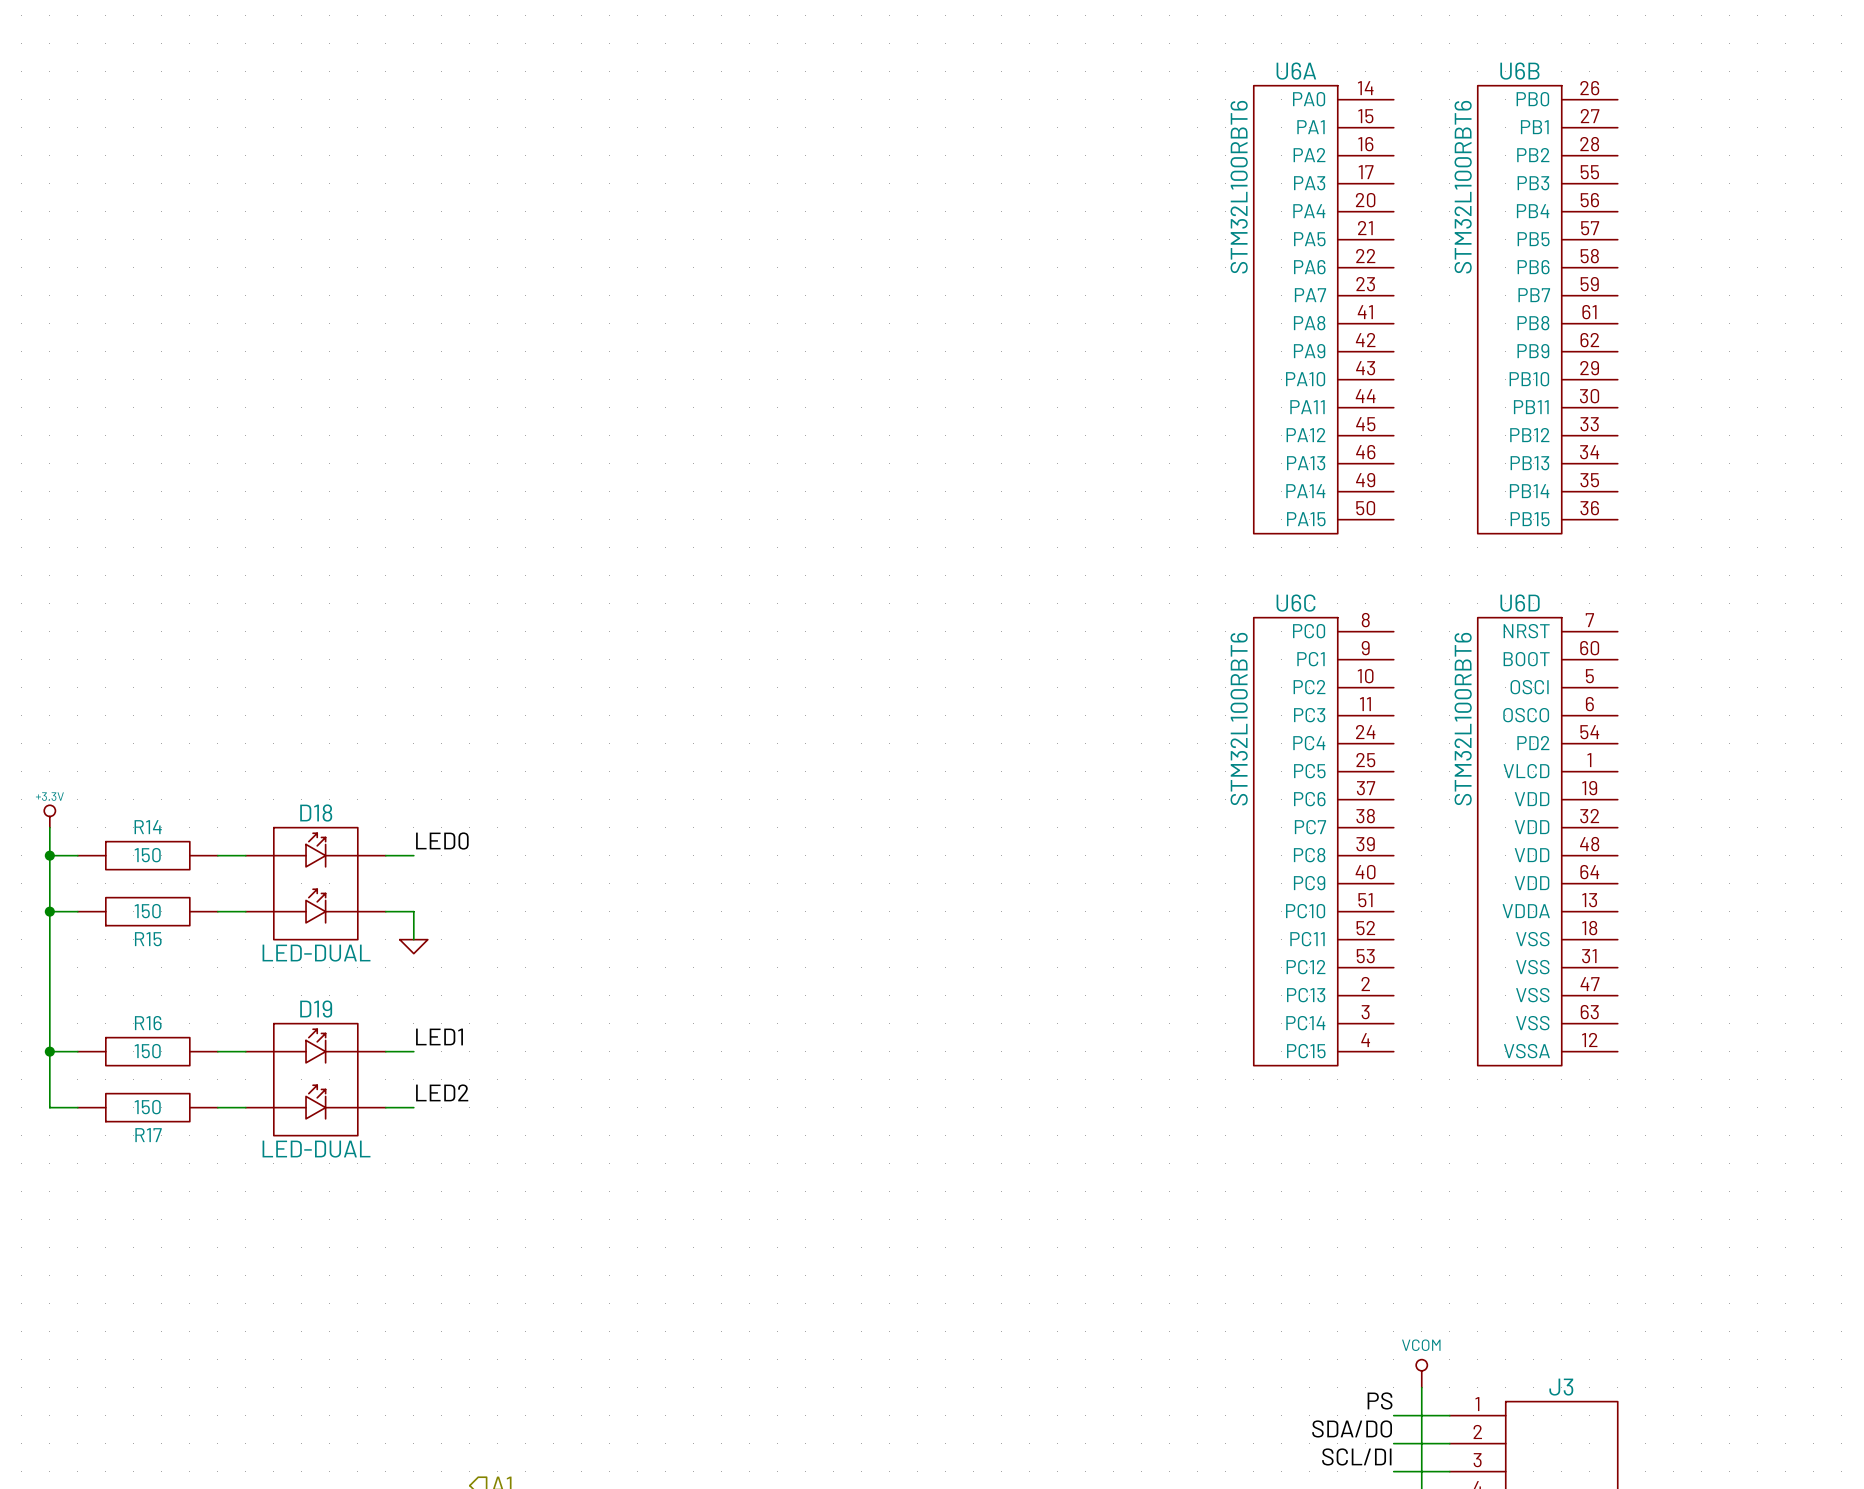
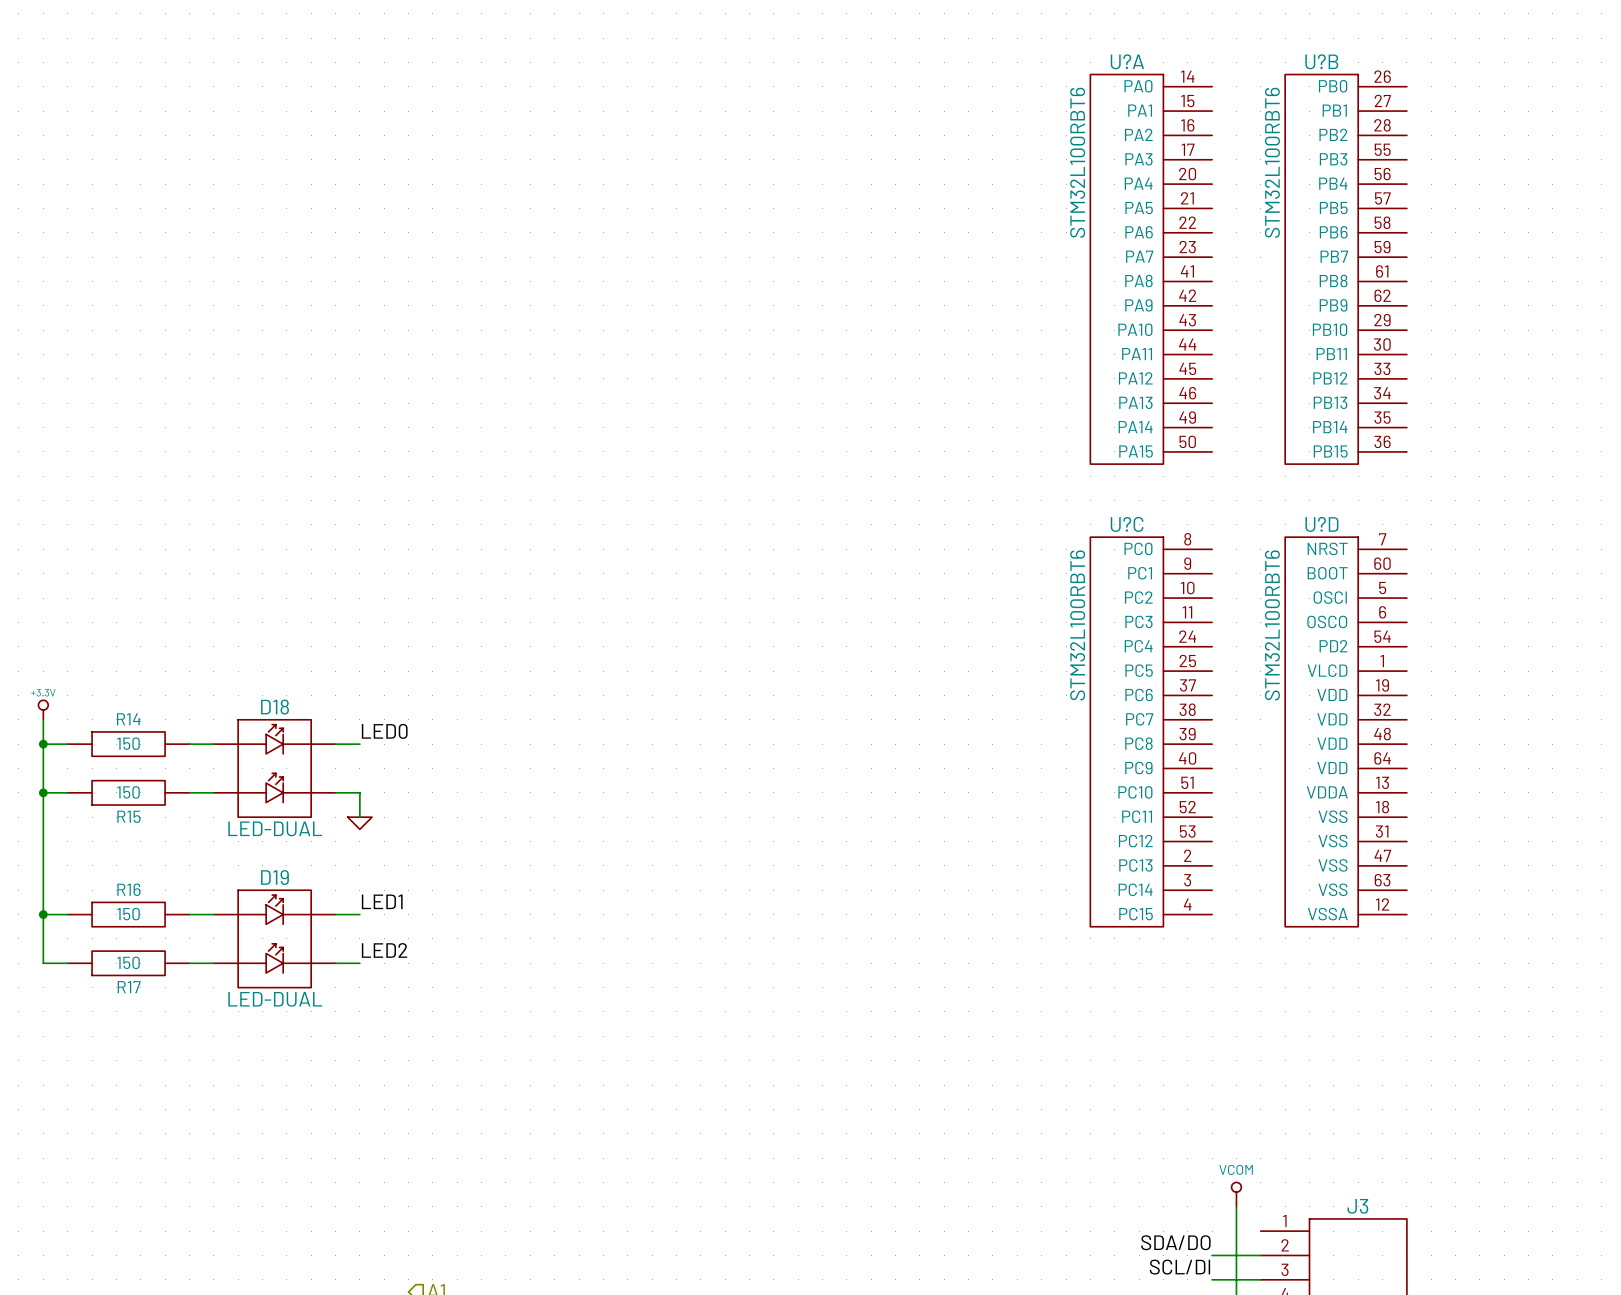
U6A name: U6A (1296, 71) -> U?A (1127, 61)
U6B name: U6B (1519, 71) -> U?B (1321, 61)
U6C name: U6C (1296, 603) -> U?C (1127, 524)
U6D name: U6D (1520, 603) -> U?D (1321, 524)
label: PS (1380, 1400) -> none
wire: (1393, 1415) (1449, 1415) -> none

